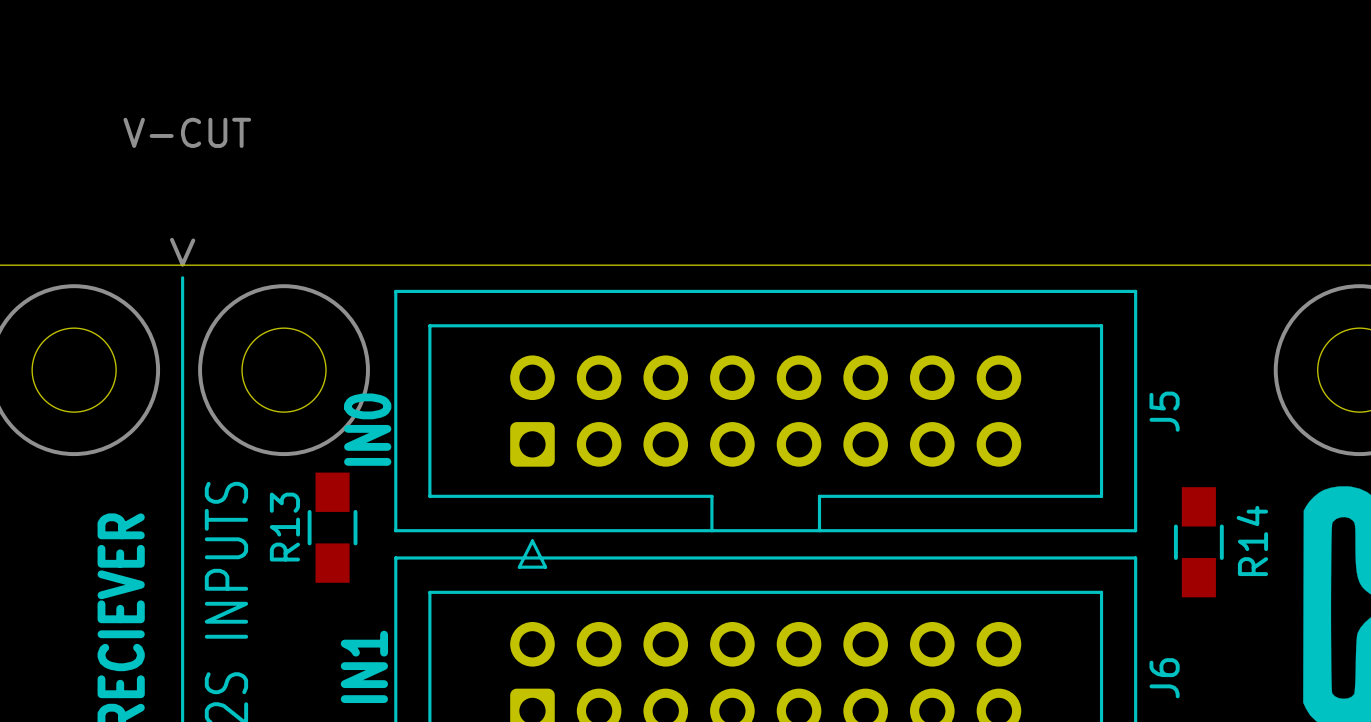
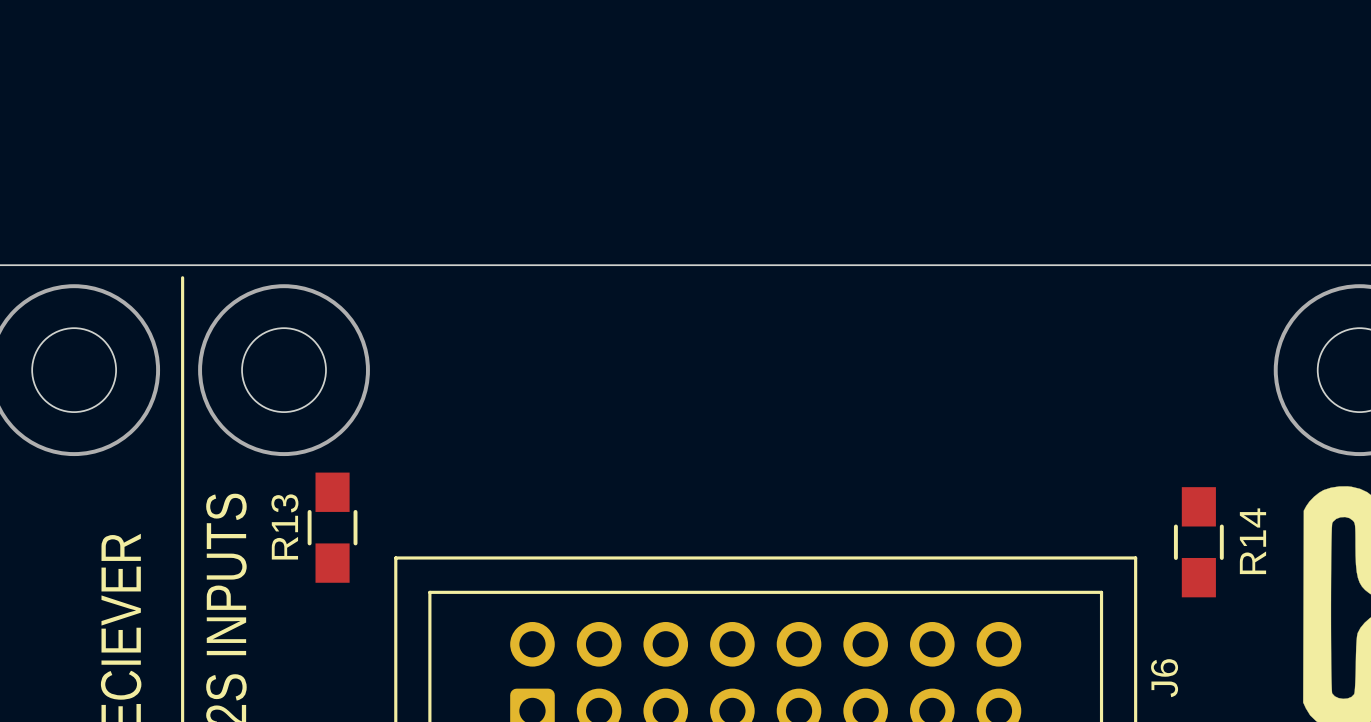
text: V-CUT (187, 132) -> none
line: (171, 239) (182, 264) (193, 240) -> none
text: IN0 (367, 429) -> none
J5: (765, 429) -> none
text: IN1 (364, 666) -> none

